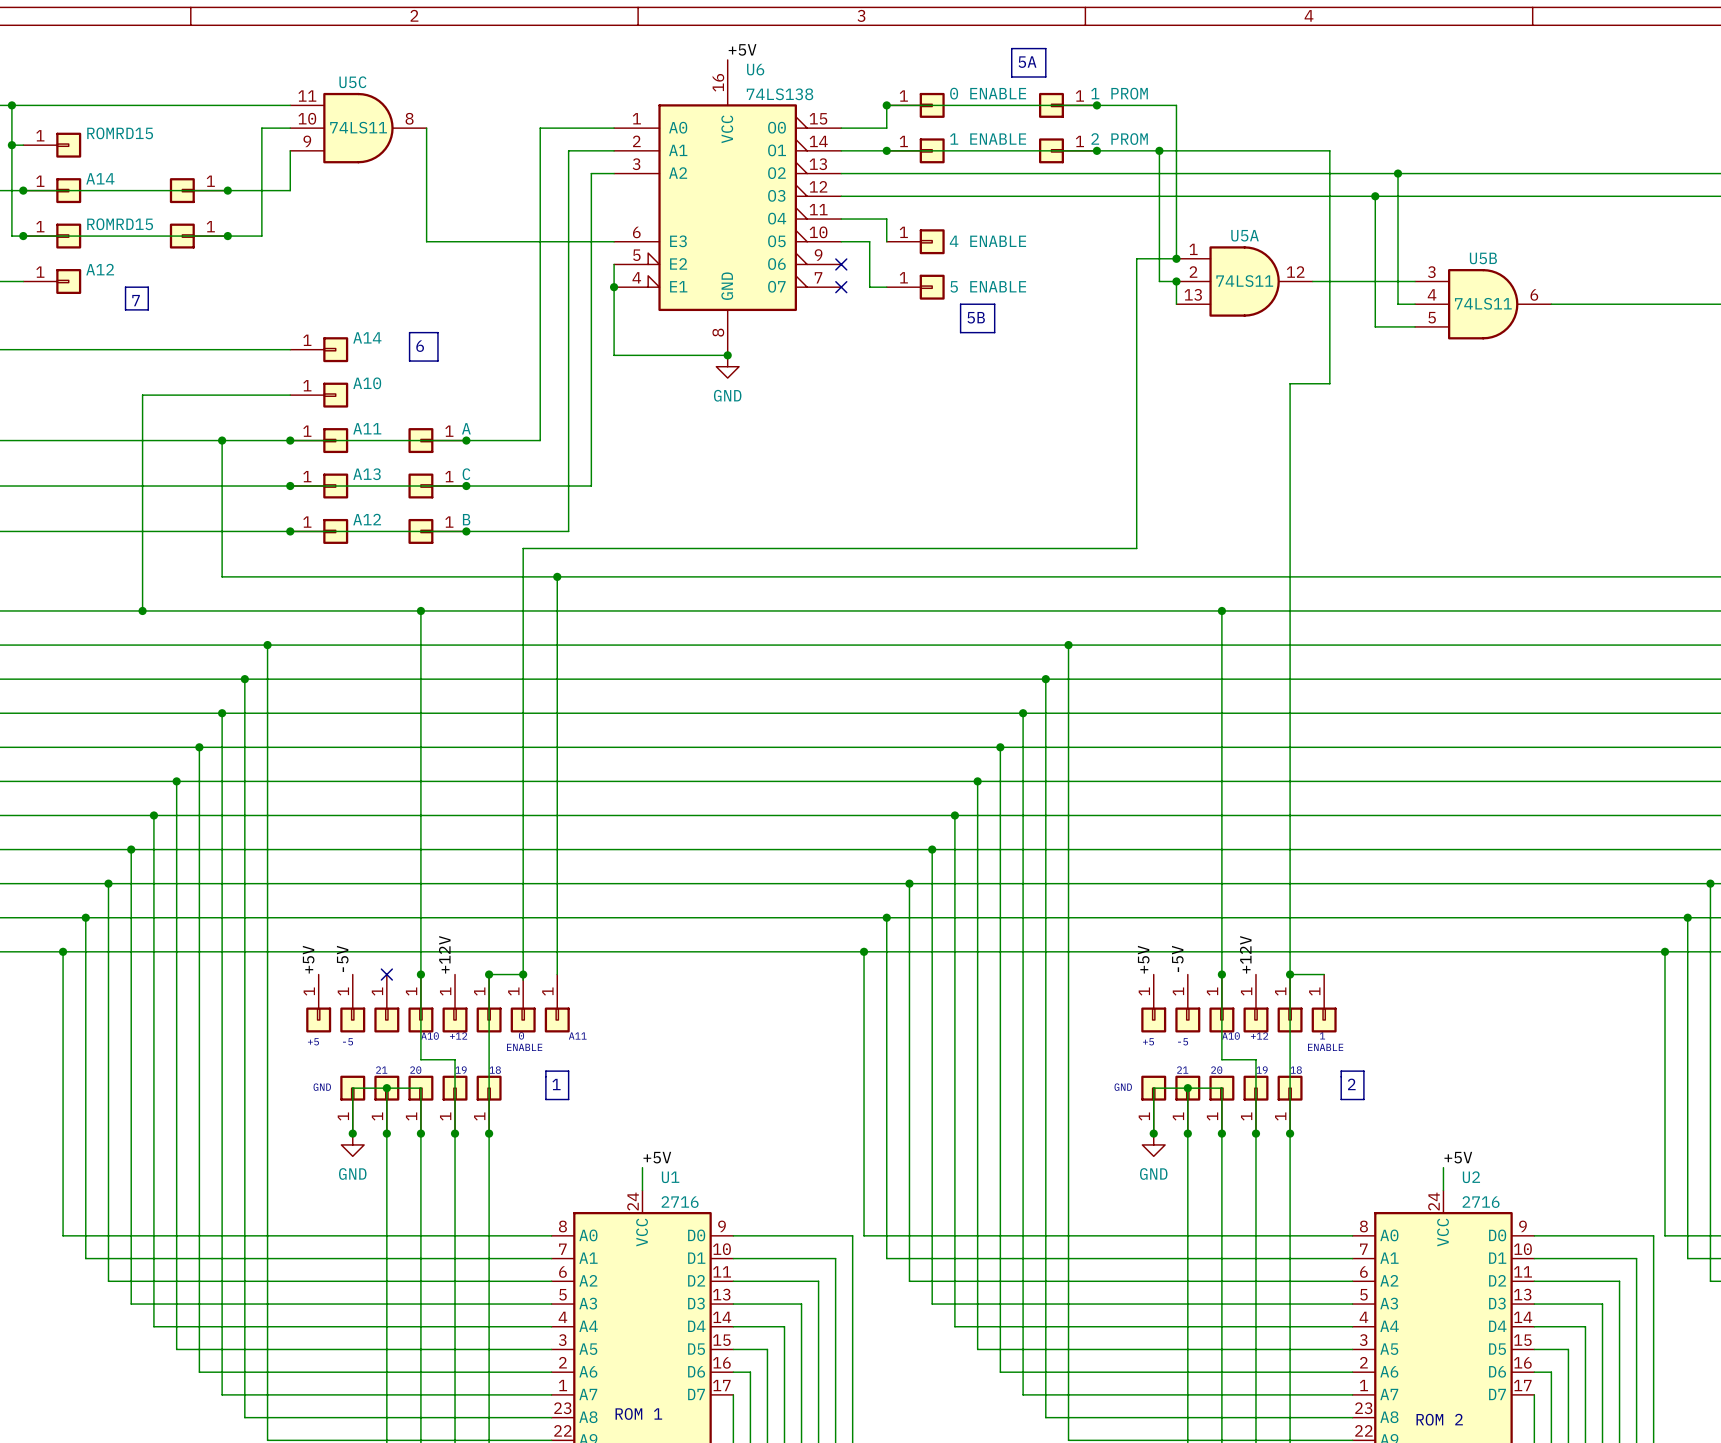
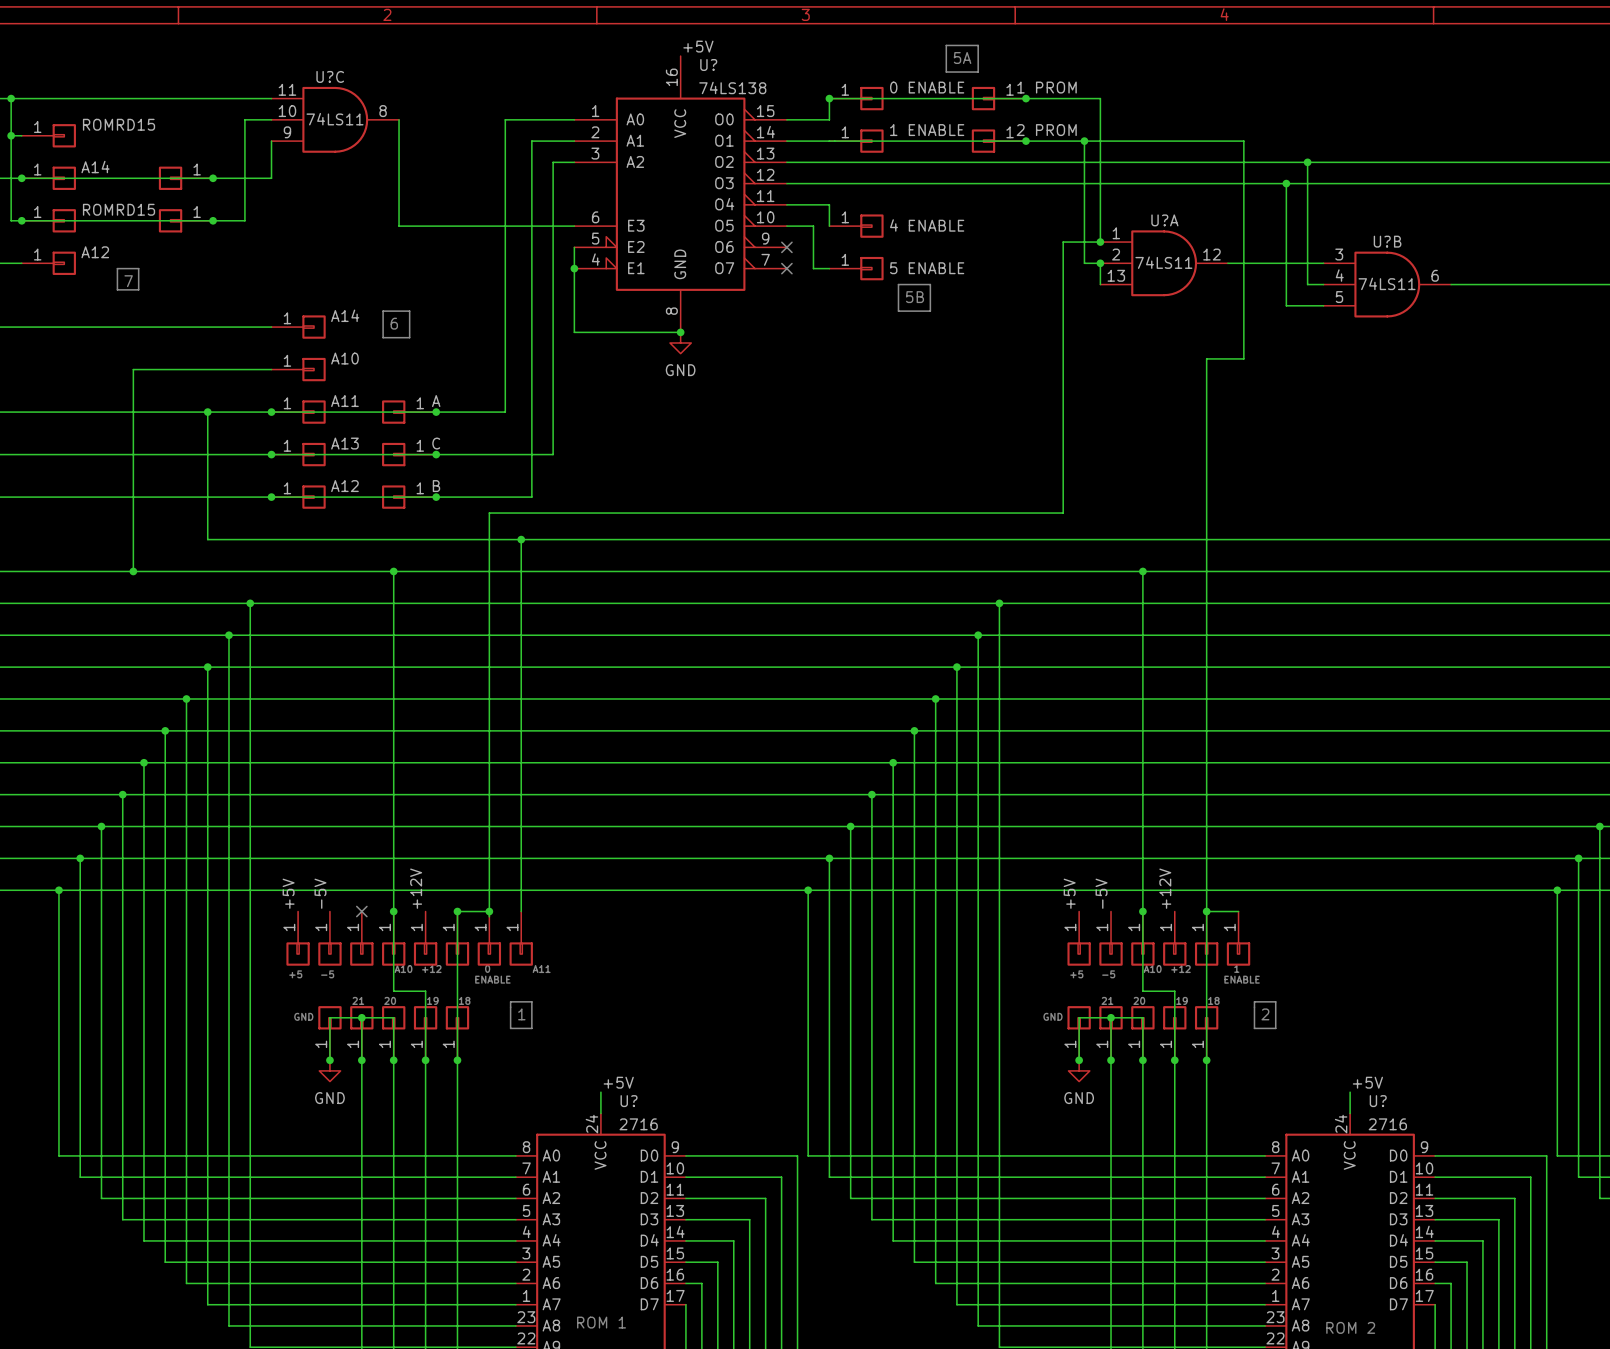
U6 name: U6 (755, 69) -> U? (708, 65)
U5C name: U5C (352, 82) -> U?C (330, 76)
junction: (886, 150) -> none
U5A name: U5A (1245, 235) -> U?A (1164, 220)
U5B name: U5B (1483, 258) -> U?B (1387, 241)
U1 name: U1 (670, 1177) -> U? (629, 1101)
U2 name: U2 (1471, 1177) -> U? (1378, 1101)

